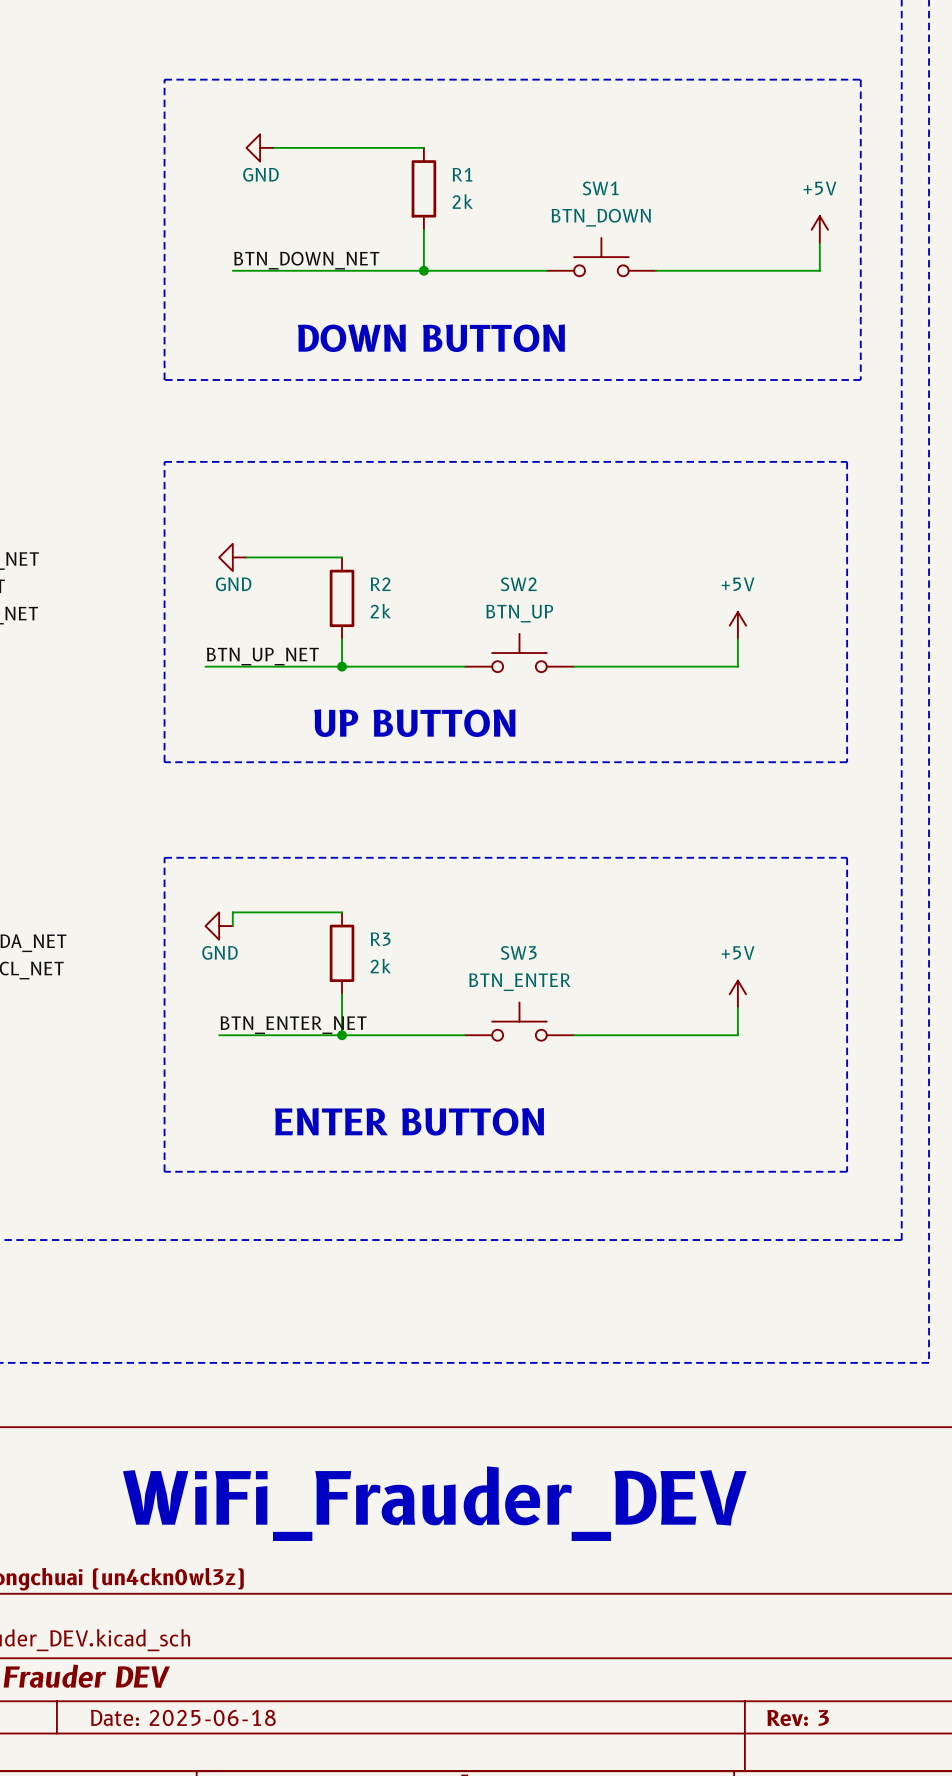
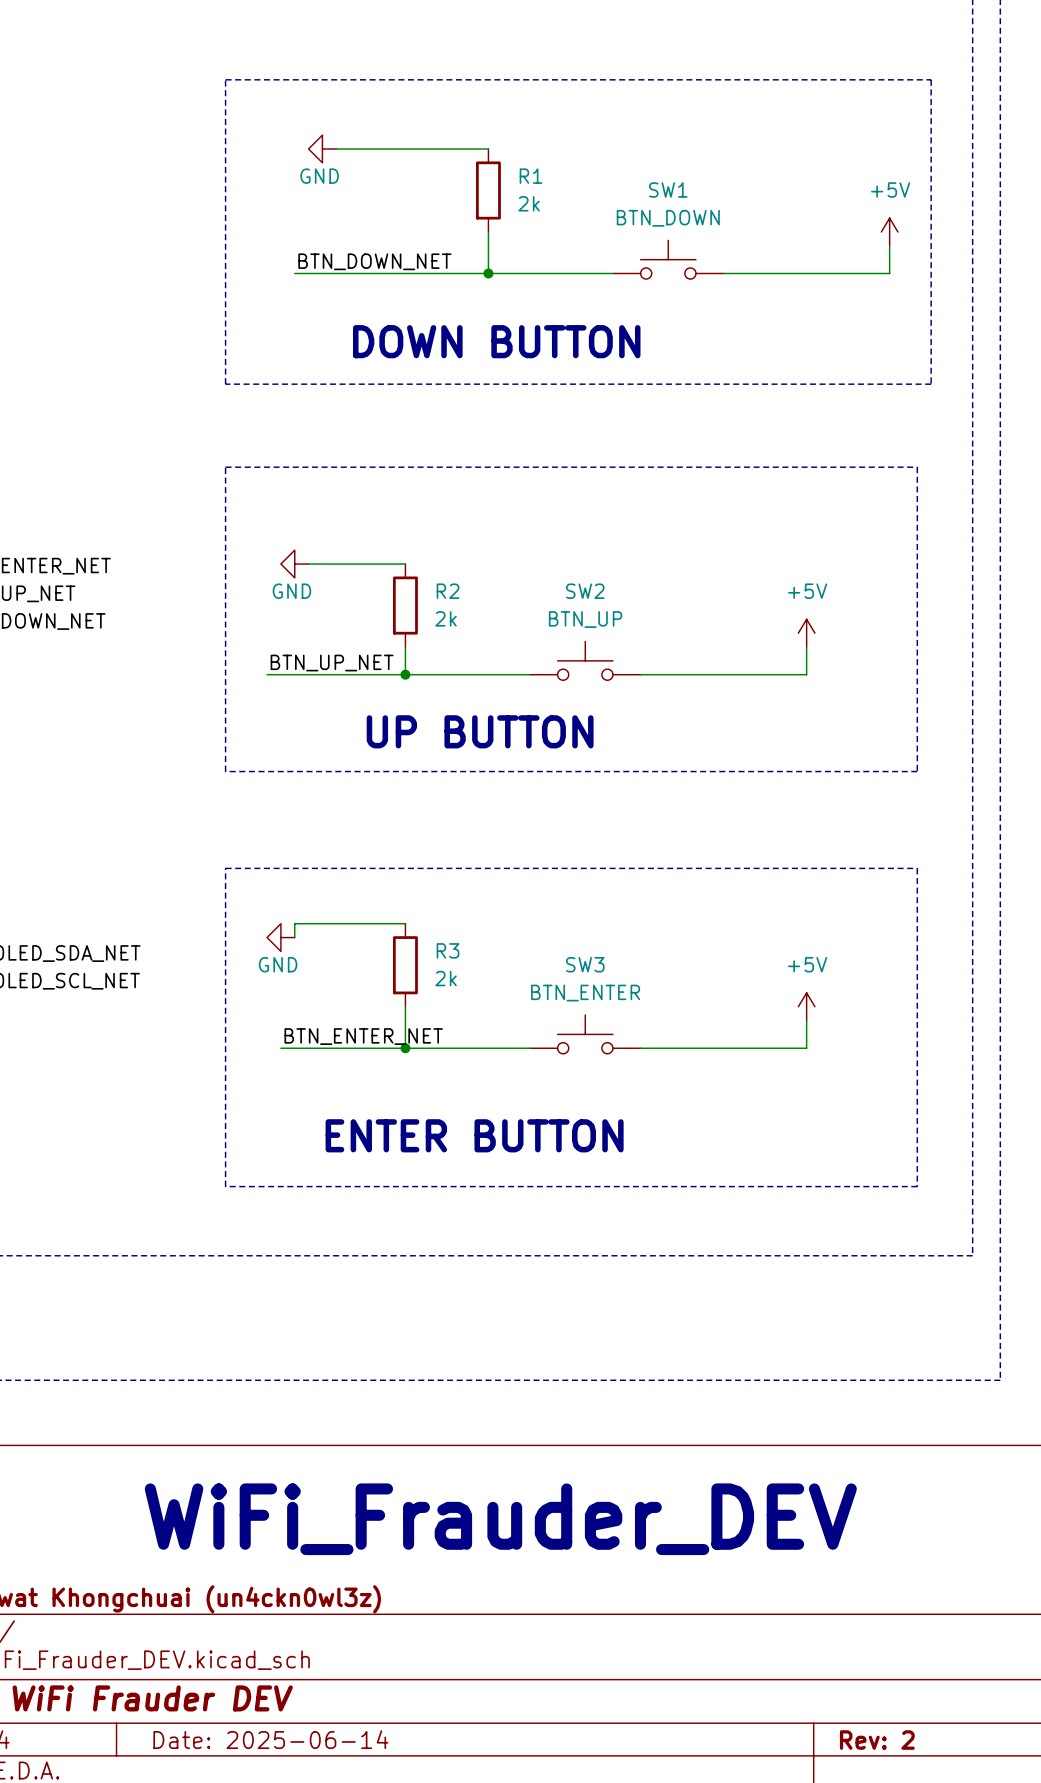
title block: Date: 2025-06-18 (183, 1717) -> Date: 2025-06-14 (270, 1739)
title block: Rev: 3 (798, 1718) -> Rev: 2 (877, 1740)

